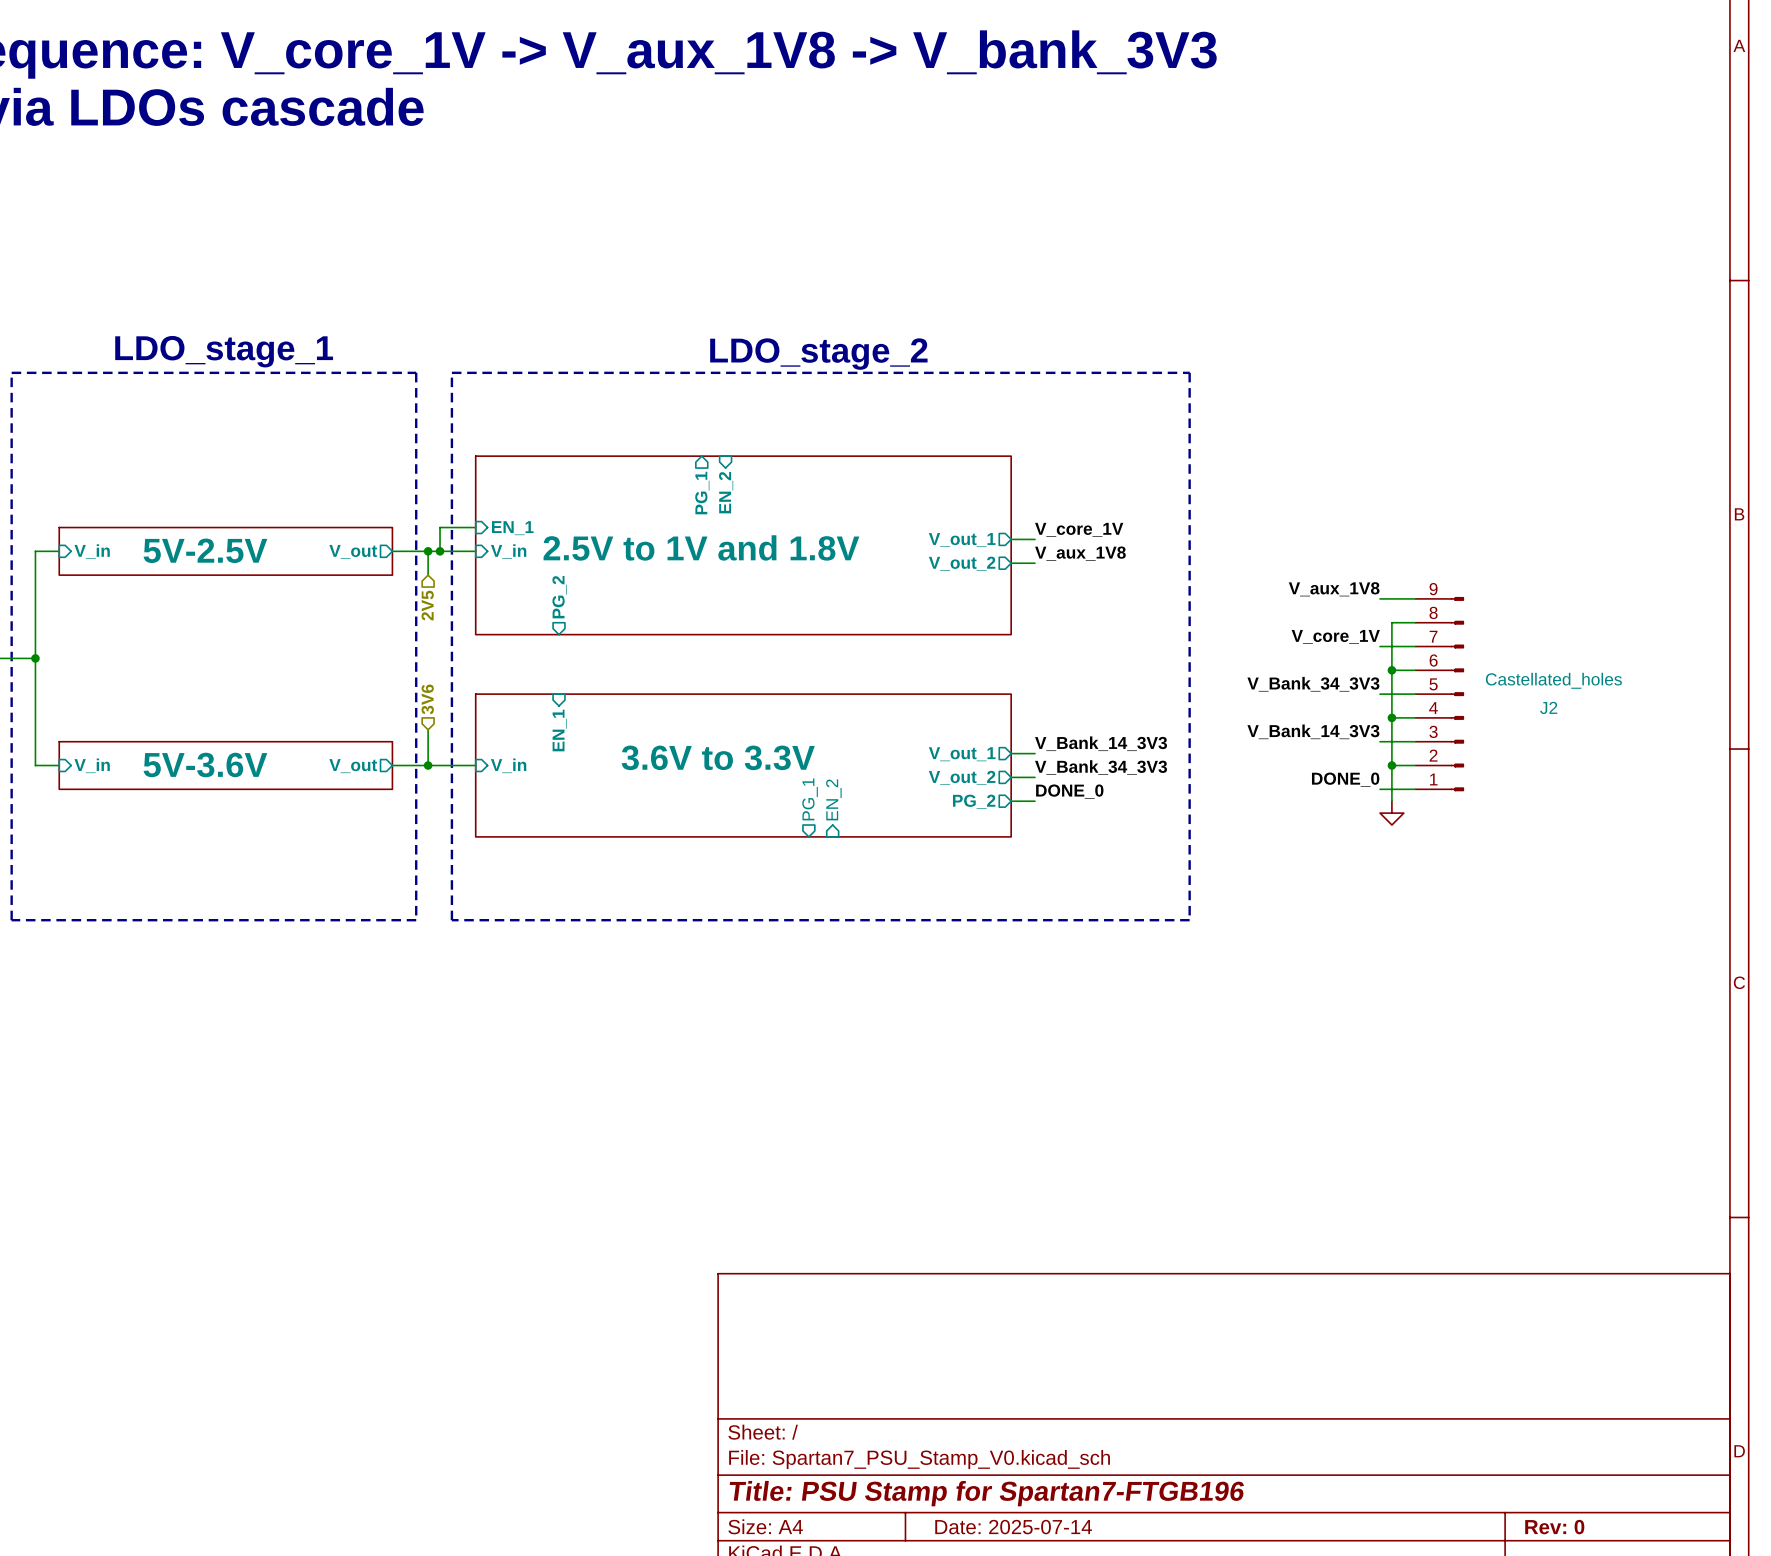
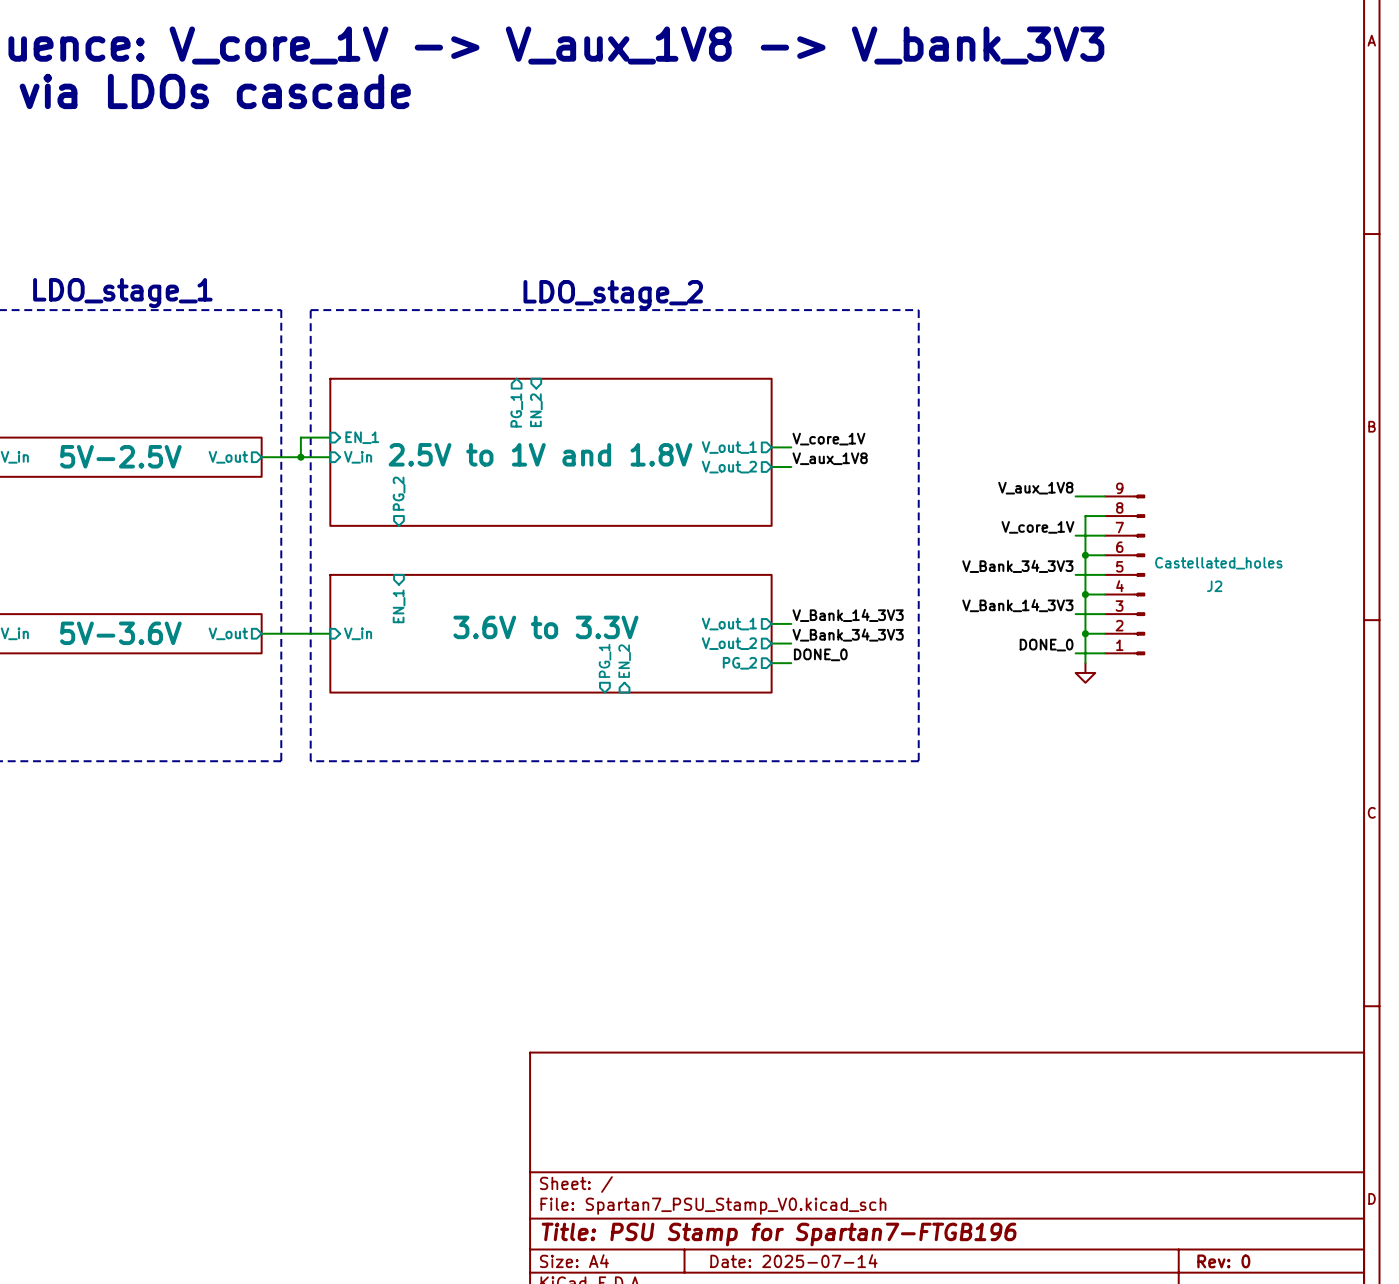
wire: (428, 551) (428, 575) -> none
junction: (428, 551) -> none
hierarchical label: 2V5 (427, 605) -> none
hierarchical label: 3V6 (427, 699) -> none
wire: (428, 729) (428, 765) -> none
junction: (428, 765) -> none

